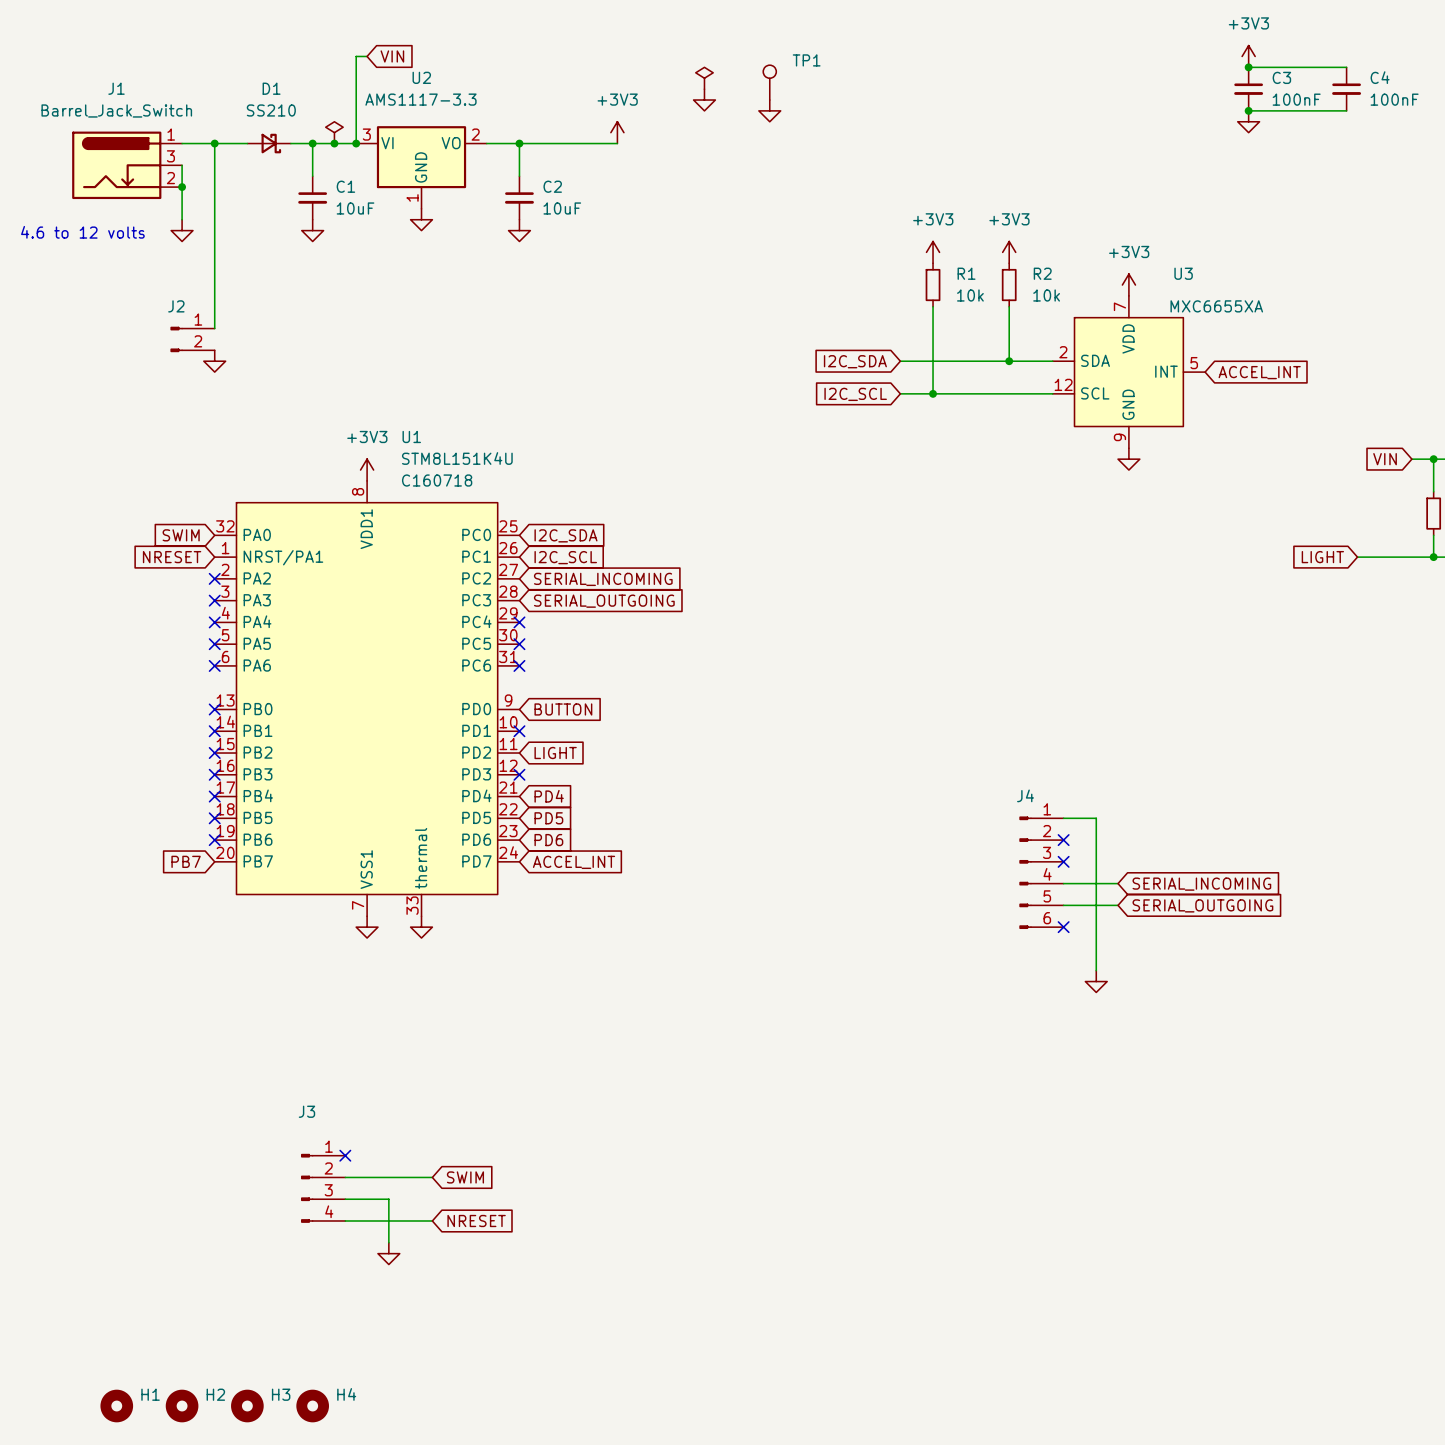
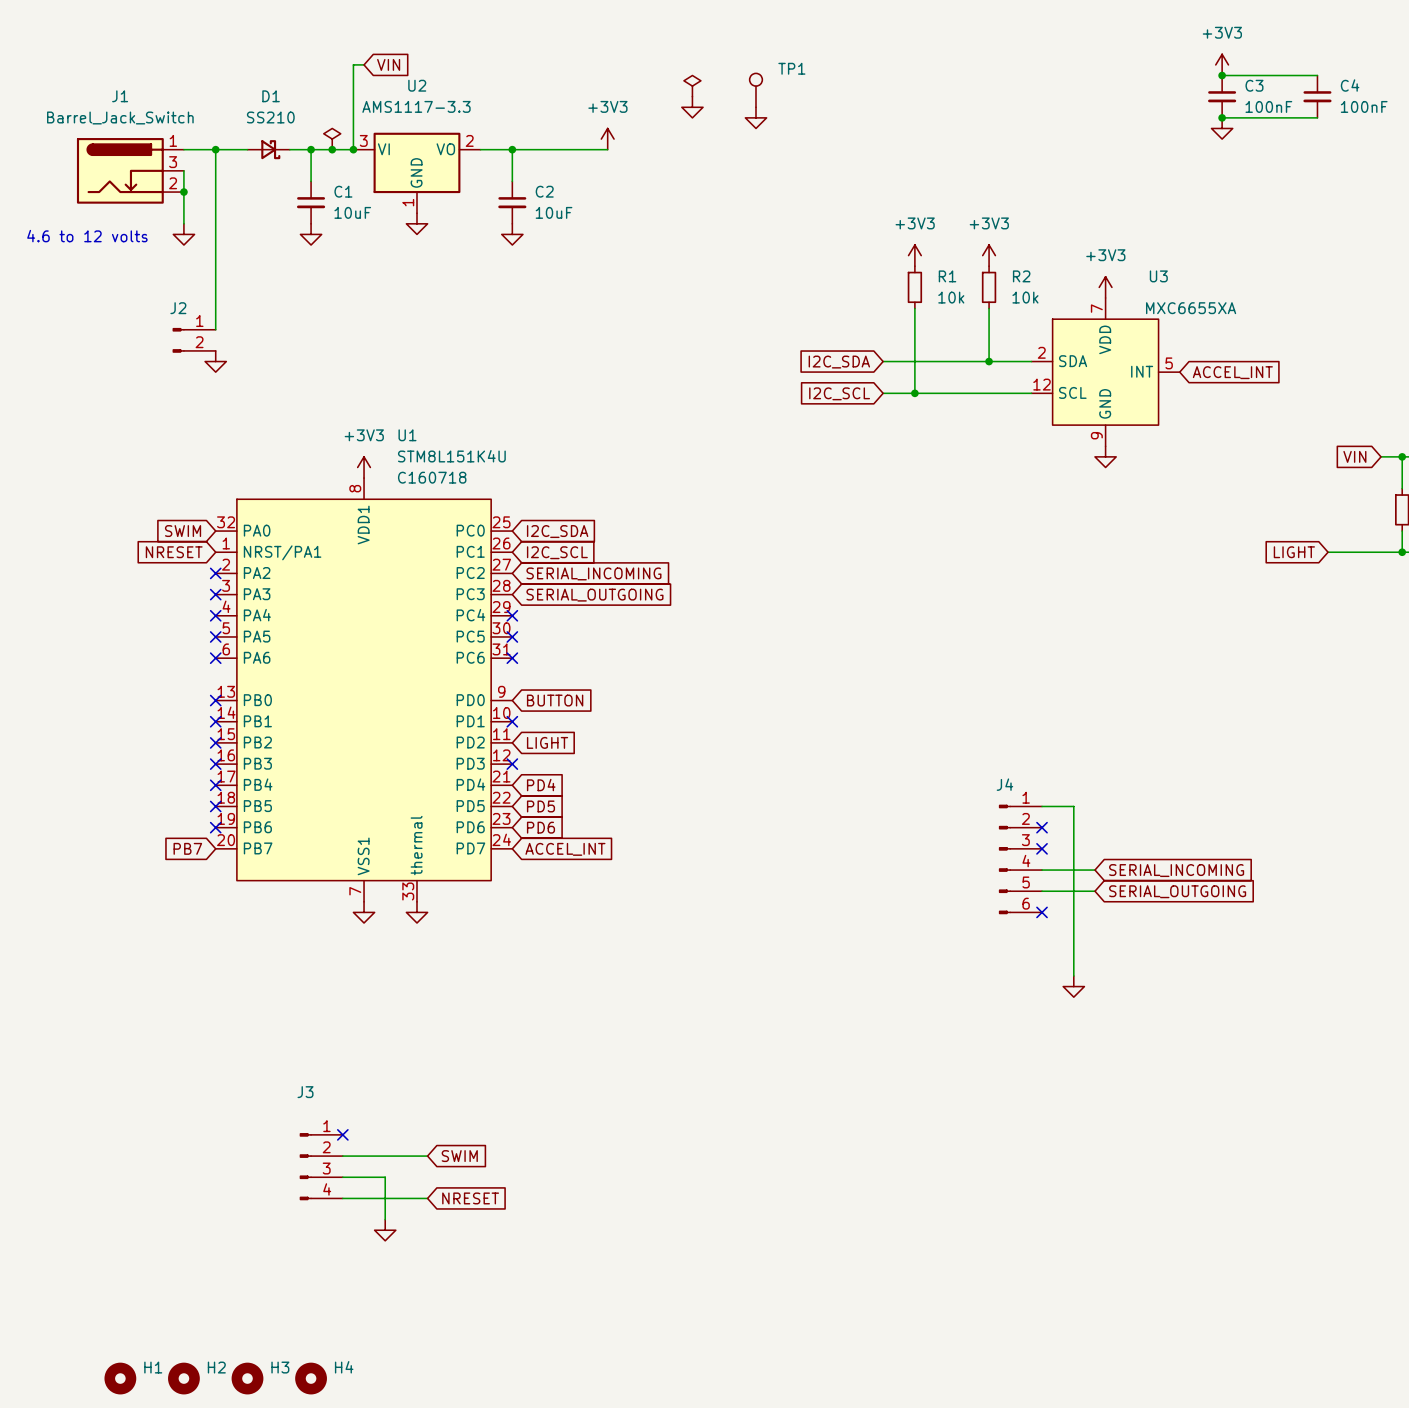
power symbol position: (1096, 981) -> (1073, 986)

